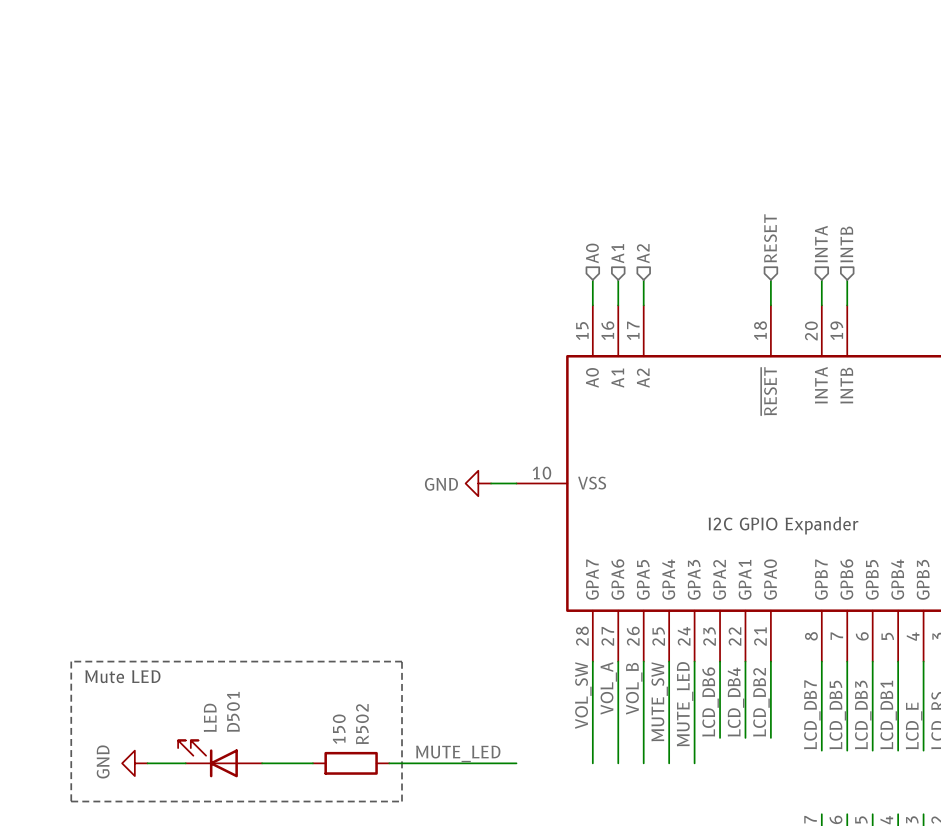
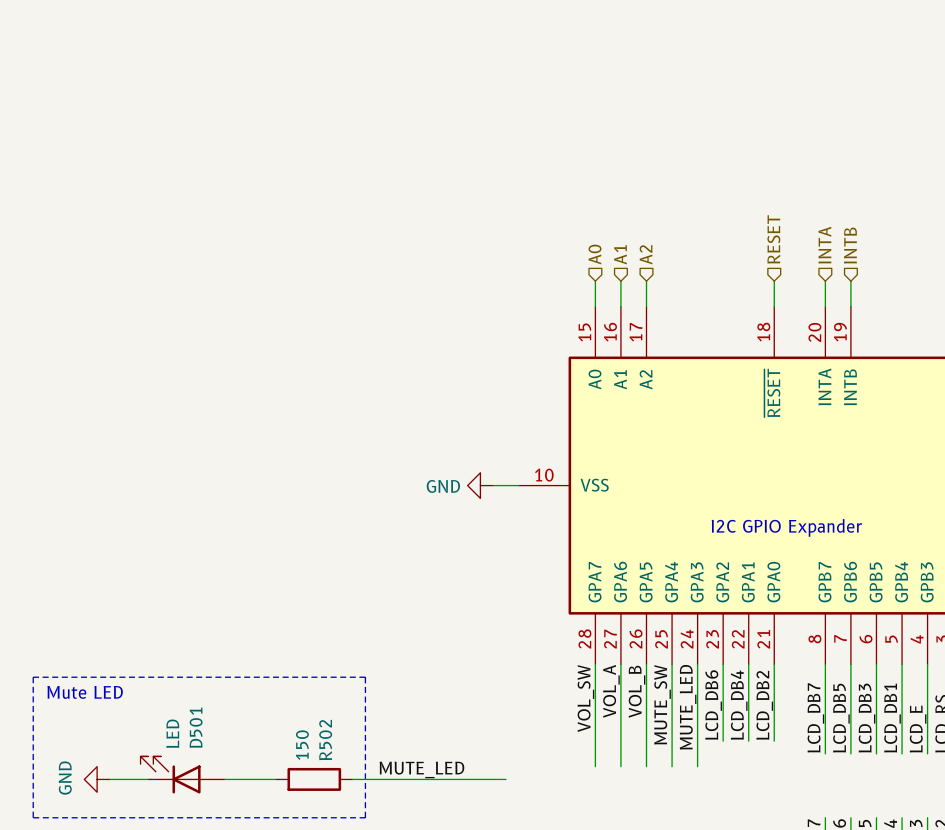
line: (71, 661) (71, 801) (402, 801) (402, 661) (71, 661) -> (33, 677) (33, 817) (365, 817) (365, 677) (33, 677)
text position: Mute LED (122, 676) -> Mute LED (85, 692)
label position: MUTE_LED (458, 753) -> MUTE_LED (421, 769)
D501 position: (220, 758) -> (182, 774)
power symbol position: GND (134, 763) -> GND (97, 779)
wire: (147, 763) (185, 763) -> (109, 779) (148, 779)
wire: (262, 763) (312, 763) -> (224, 779) (275, 779)
R502 position: (351, 763) -> (314, 779)
wire: (389, 763) (516, 763) -> none
wire: none -> (352, 779) (505, 779)

